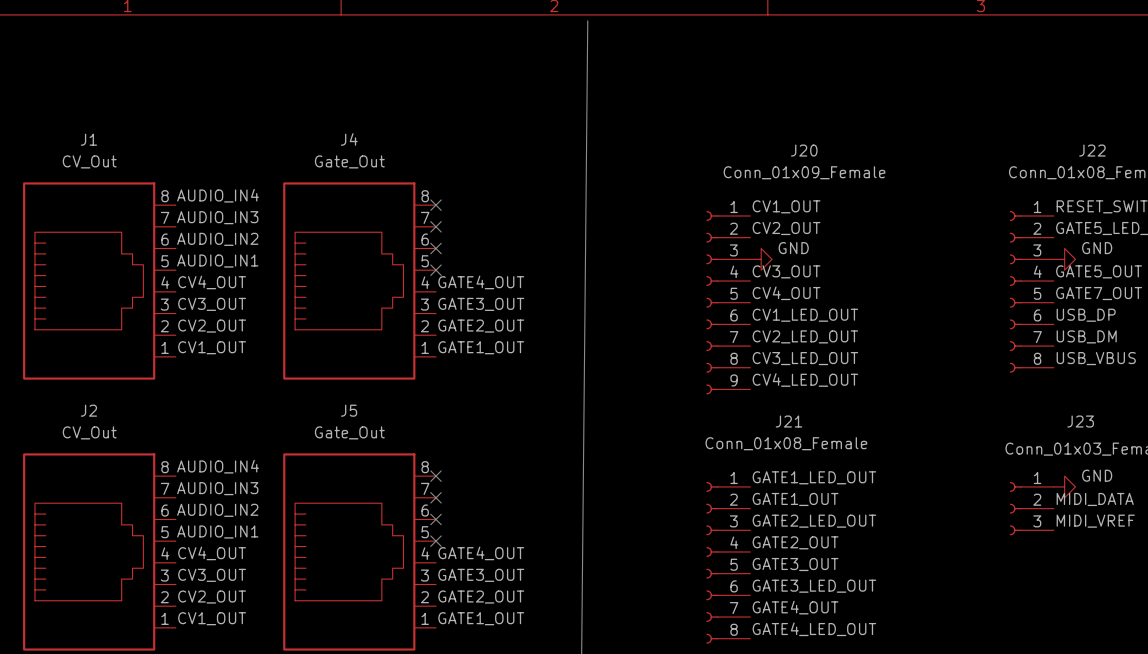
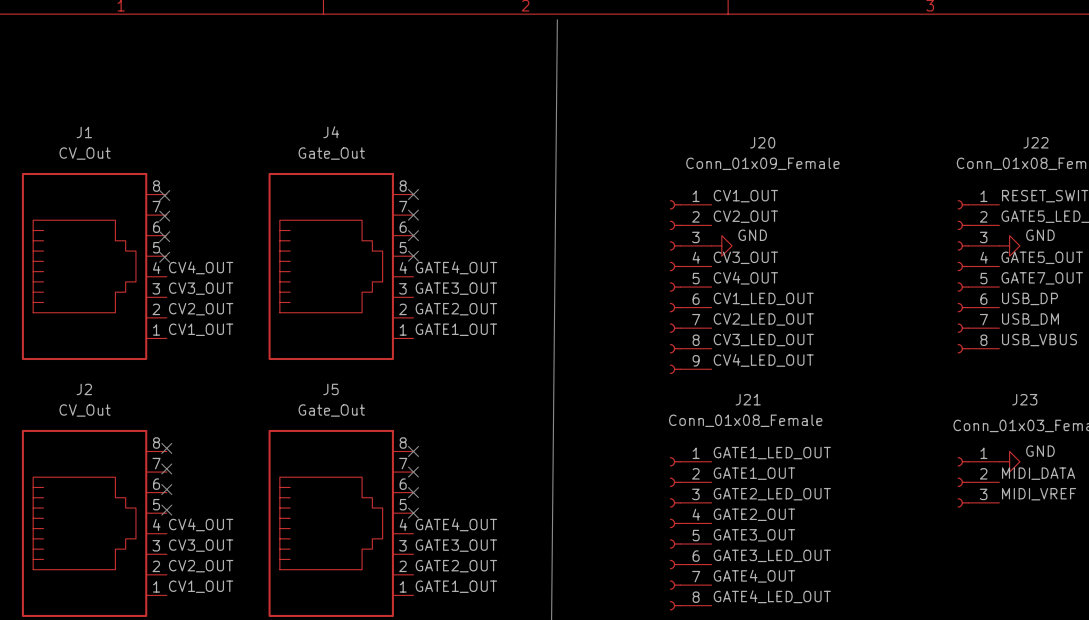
label: AUDIO_IN4 (218, 195) -> none
no-connect mark: none -> (164, 195)
label: AUDIO_IN3 (217, 217) -> none
no-connect mark: none -> (164, 216)
label: AUDIO_IN2 (217, 239) -> none
no-connect mark: none -> (164, 236)
label: AUDIO_IN1 (217, 261) -> none
no-connect mark: none -> (164, 257)
label: AUDIO_IN4 (218, 466) -> none
no-connect mark: none -> (166, 448)
label: AUDIO_IN3 (217, 488) -> none
no-connect mark: none -> (166, 468)
label: AUDIO_IN2 (217, 510) -> none
no-connect mark: none -> (166, 489)
label: AUDIO_IN1 (217, 531) -> none
no-connect mark: none -> (166, 510)

